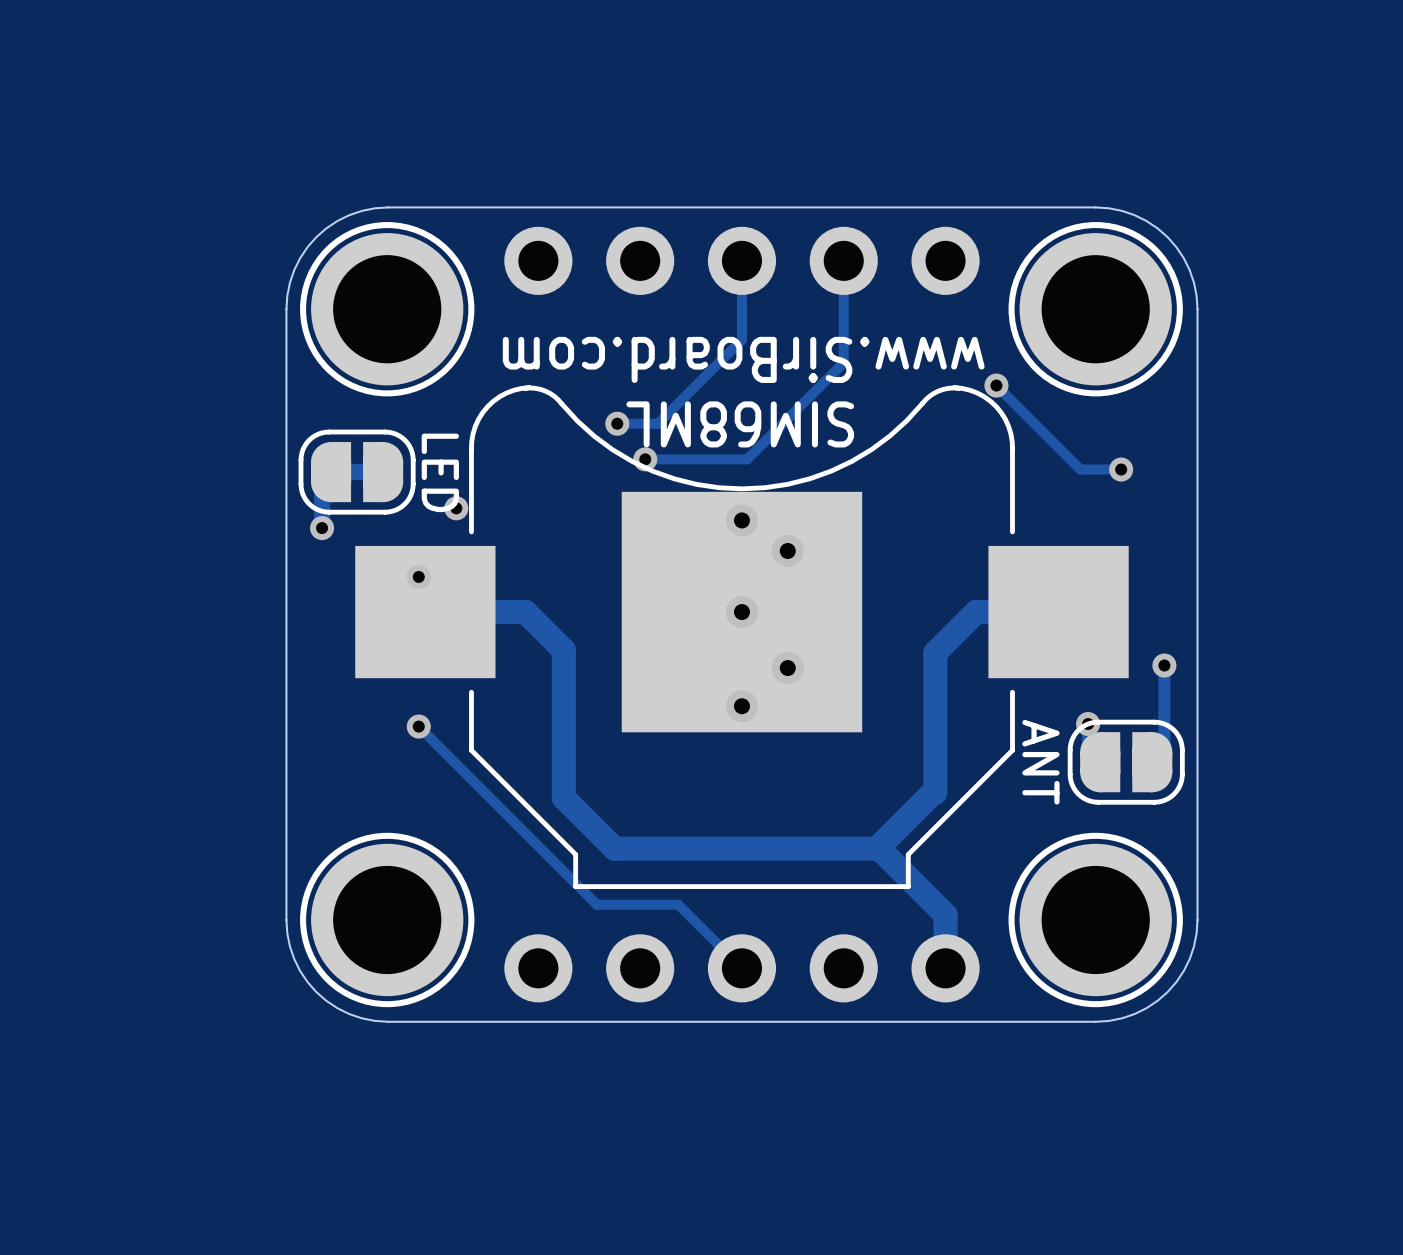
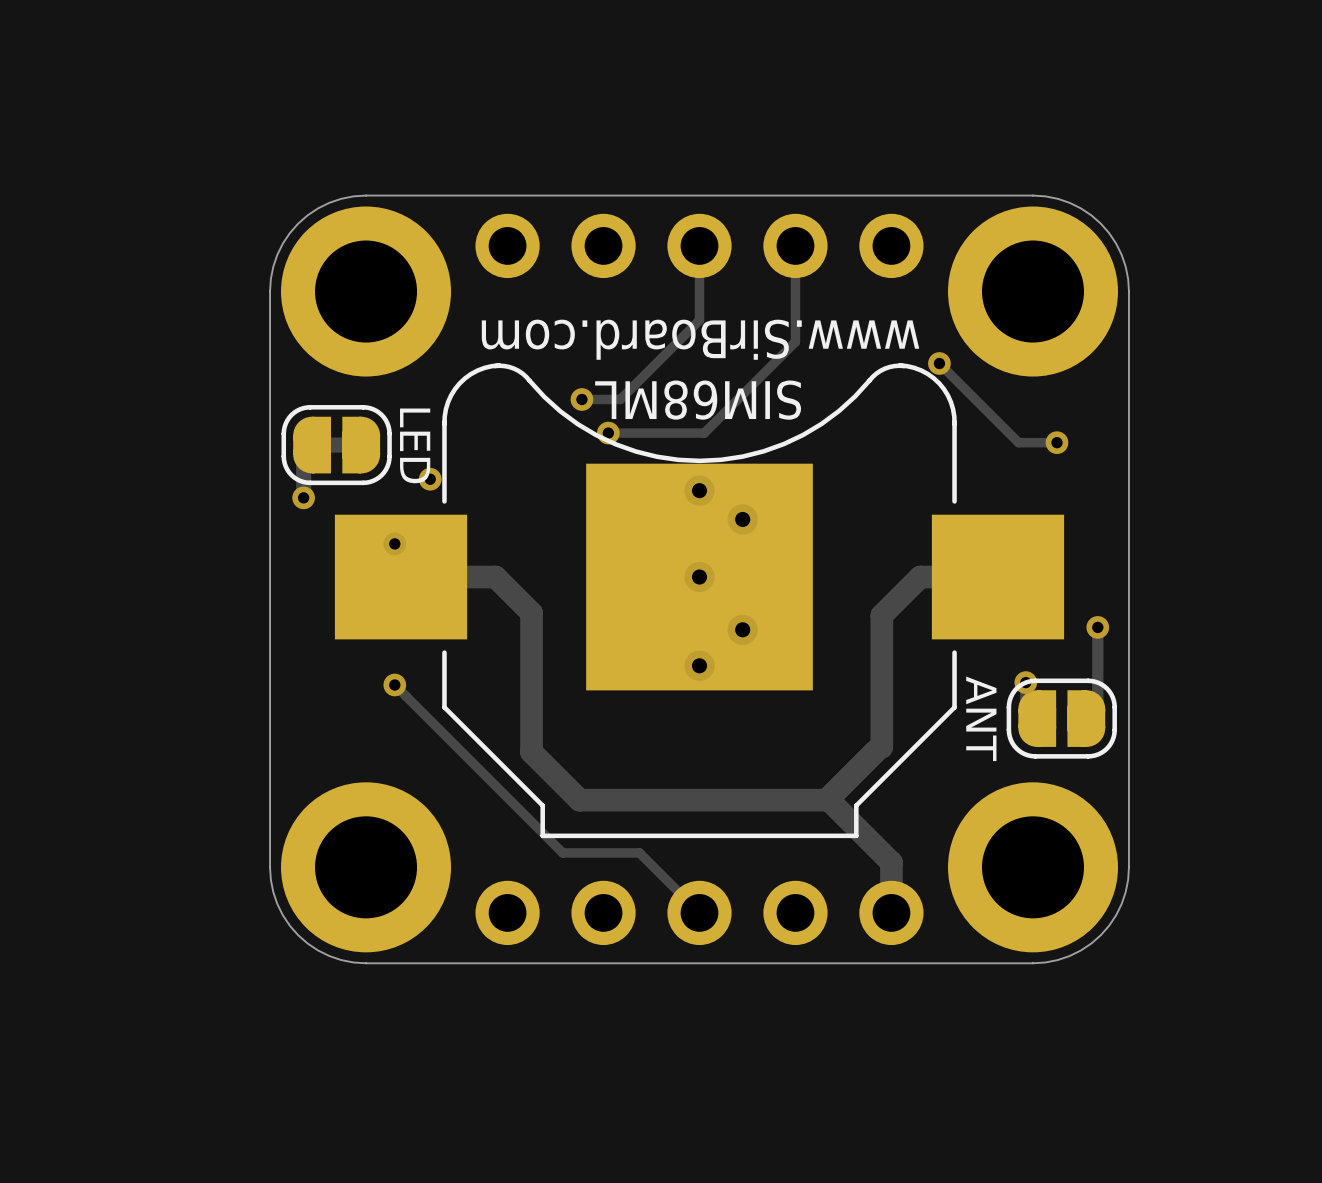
part footprint: [300, 222, 475, 397] -> [281, 206, 452, 377]
part footprint: [1008, 222, 1183, 397] -> [947, 206, 1119, 377]
part footprint: [300, 832, 475, 1008] -> [281, 782, 452, 953]
part footprint: [1008, 832, 1183, 1008] -> [947, 782, 1119, 953]

